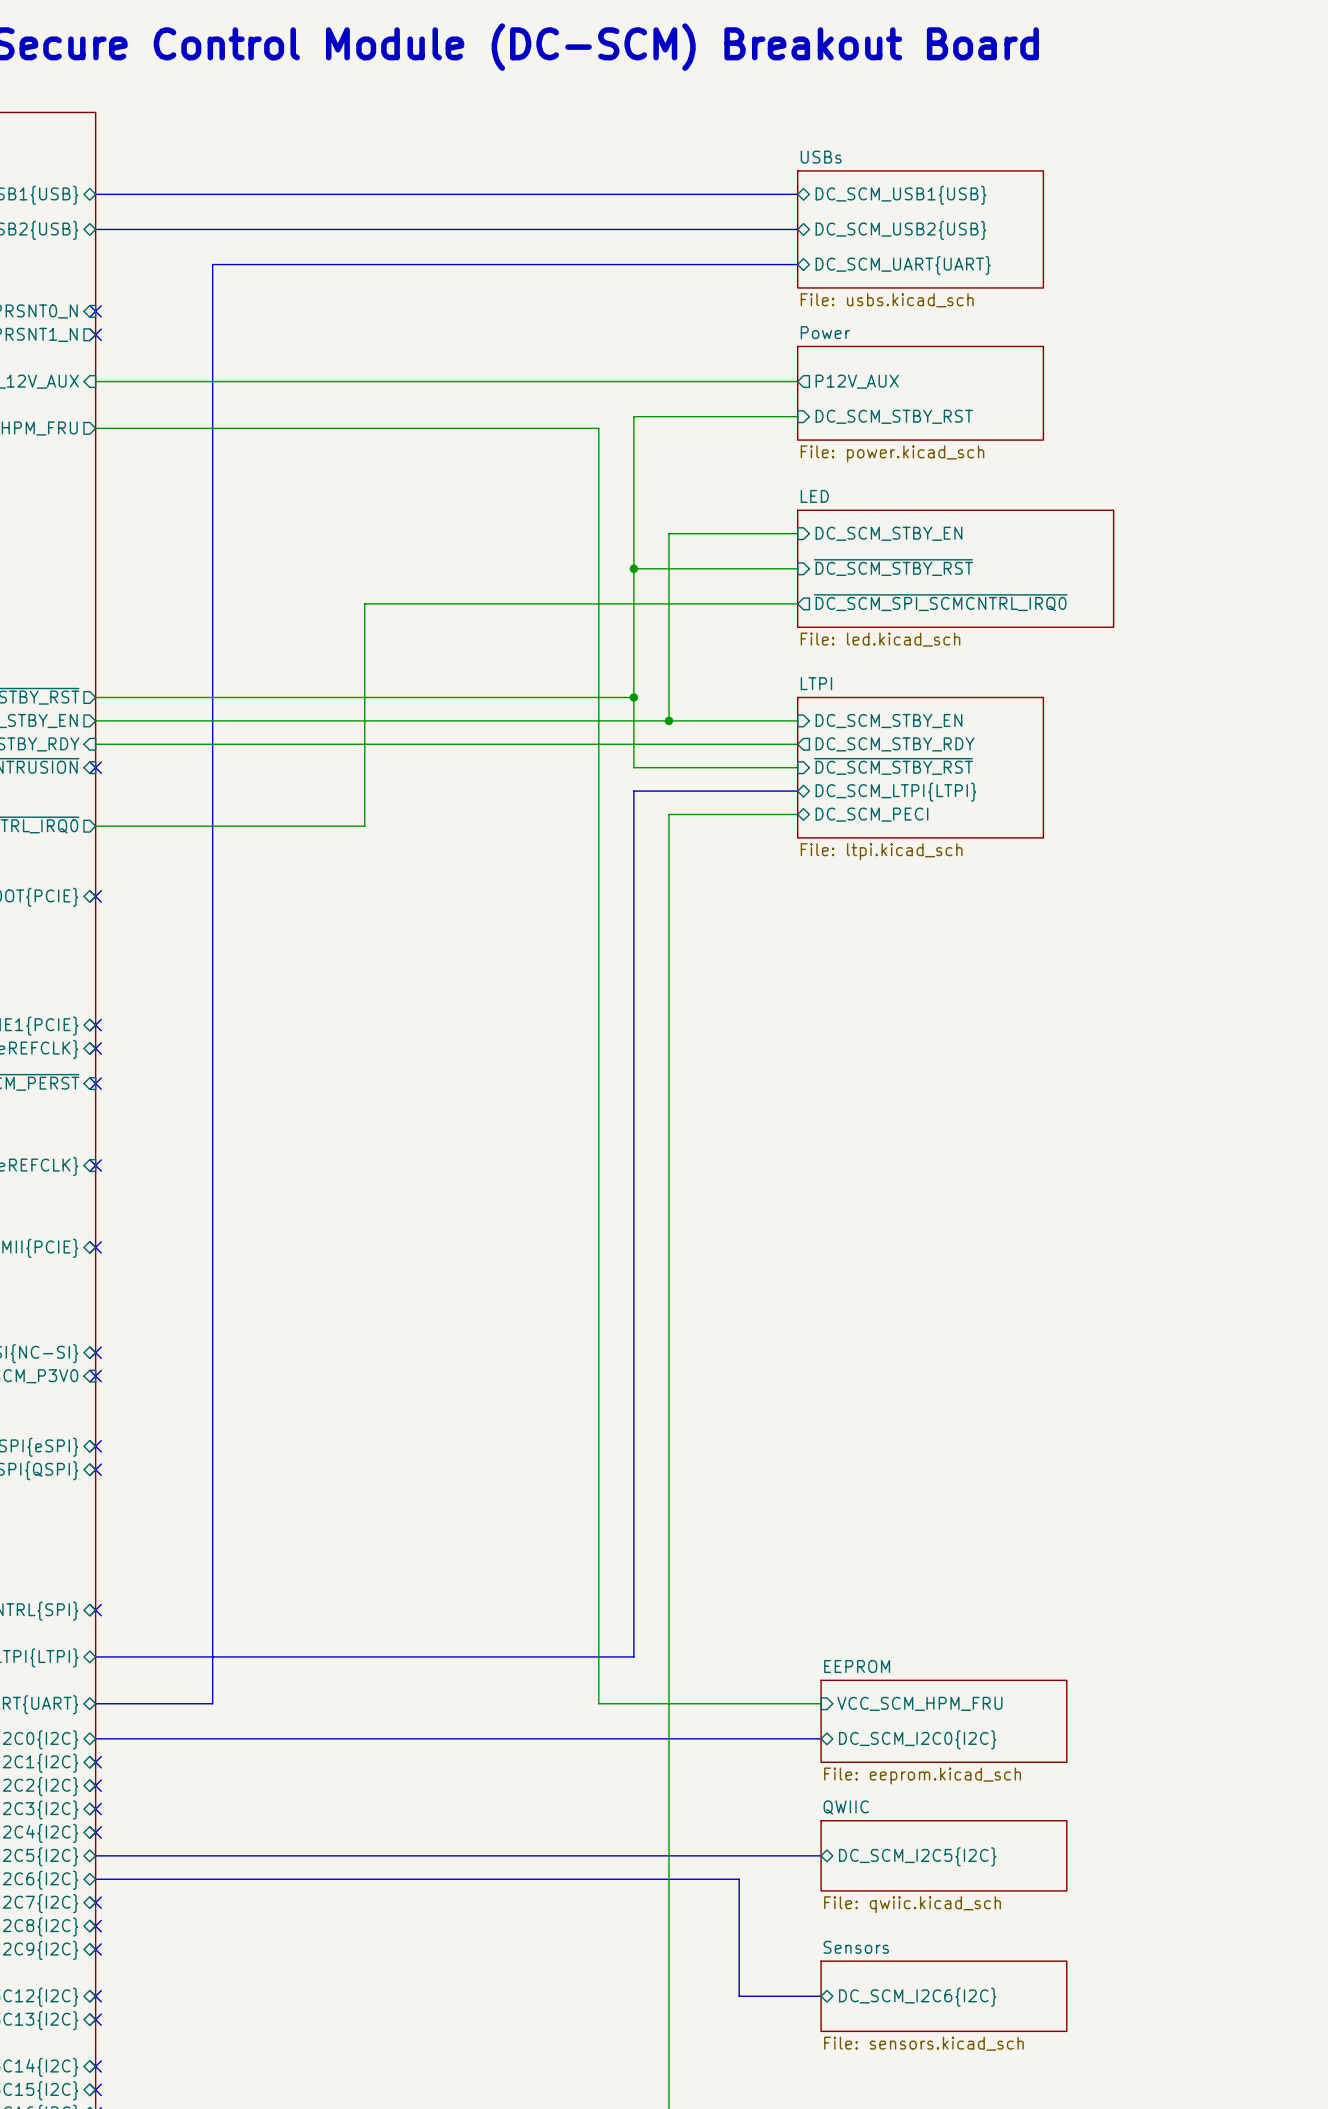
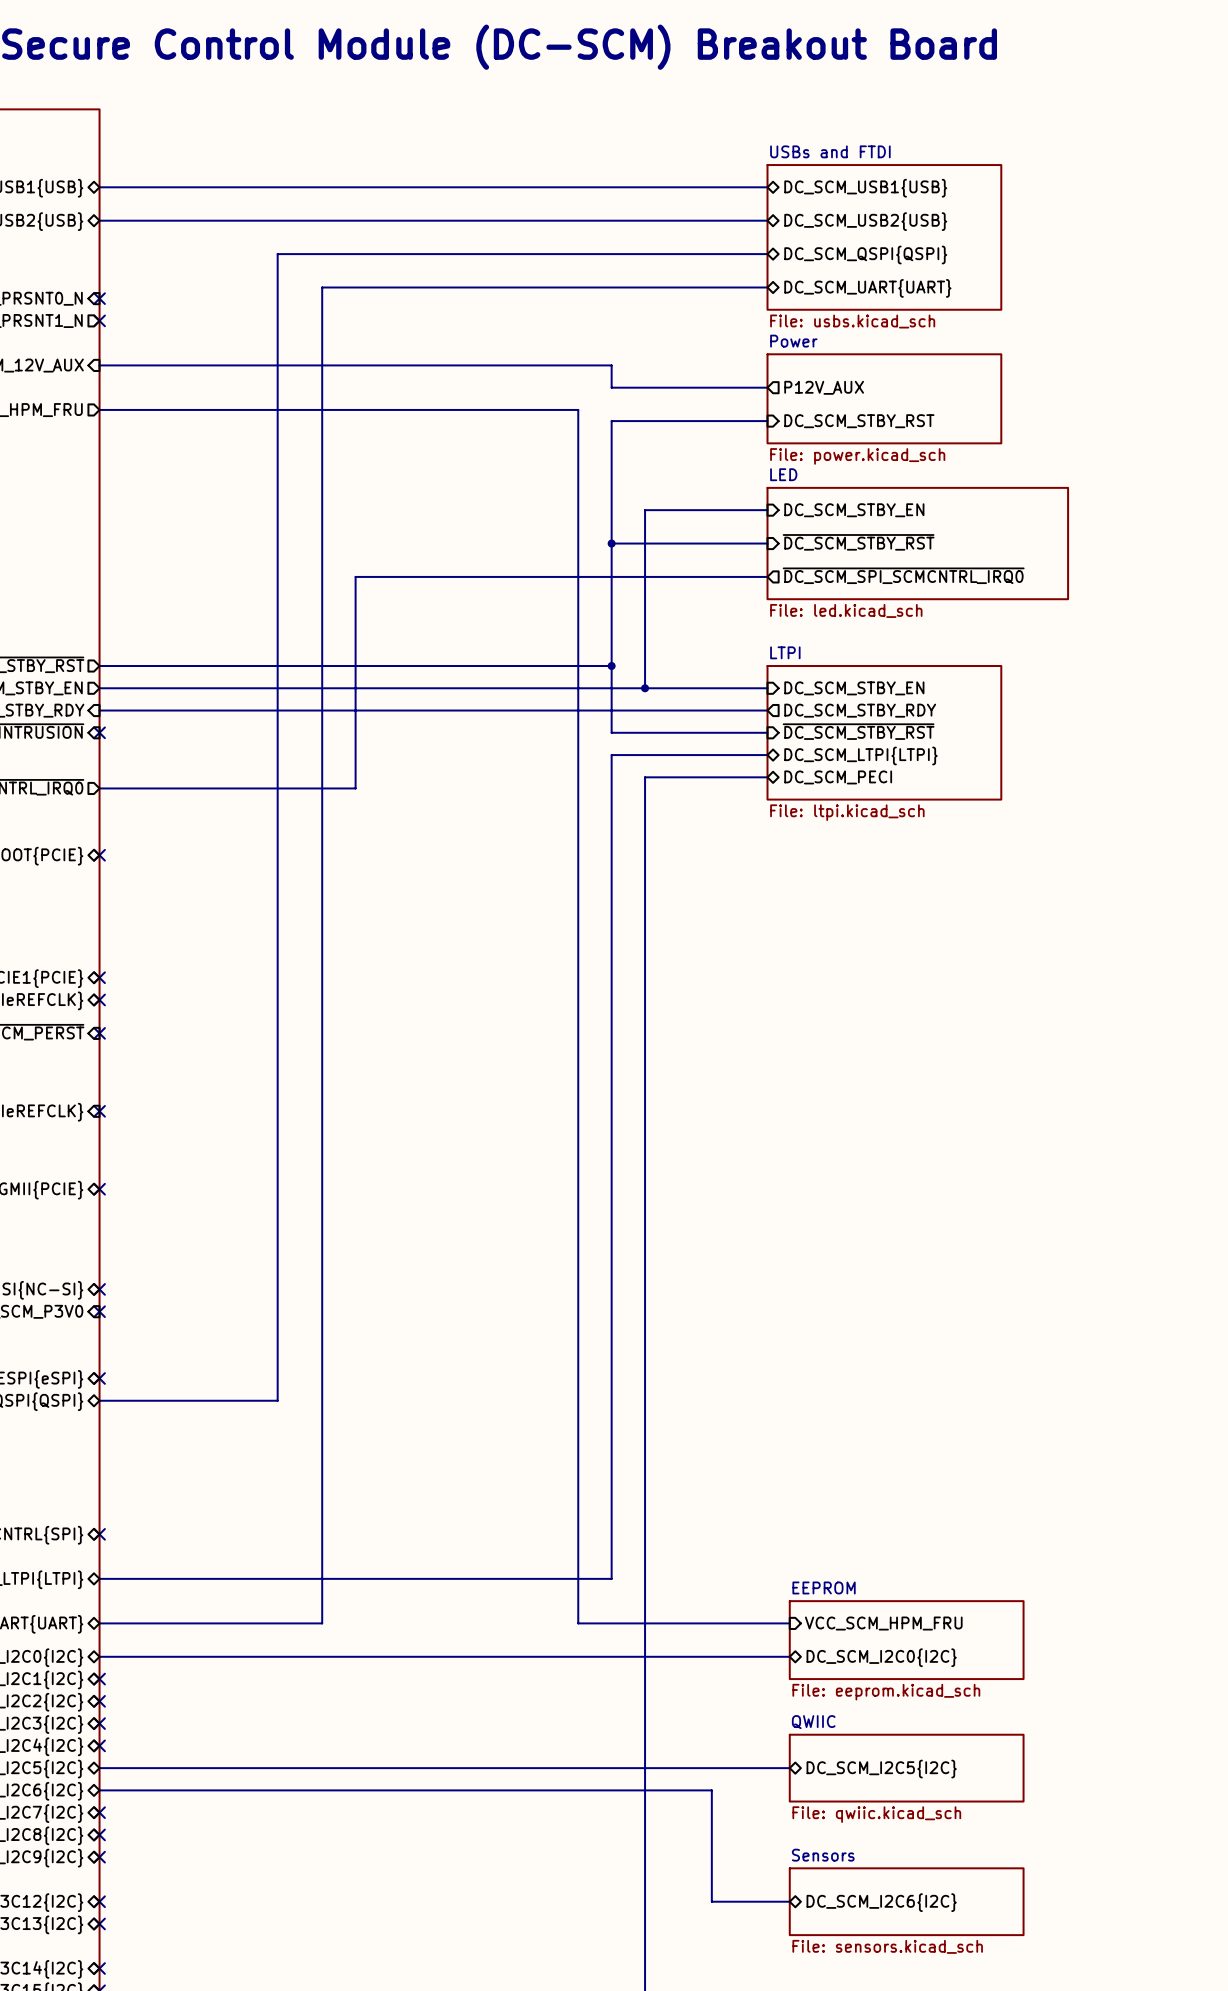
sheet USBs: File: usbs.kicad_sch (920, 229) -> none
sheet USBs and FTDI: none -> File: usbs.kicad_sch (884, 237)
bus: (282, 264) (212, 264) (212, 1703) -> (277, 254) (277, 1400) (99, 1400)
sheet pin: DC_SCM_UART{UART} (903, 265) -> DC_SCM_QSPI{QSPI} (865, 255)
bus: none -> (767, 287) (322, 287) (322, 1623) (210, 1623)
sheet pin: none -> DC_SCM_UART{UART} (867, 288)
wire: (633, 381) (797, 381) -> (611, 365) (611, 387) (767, 387)
sheet pin position: P12V_AUX (857, 381) -> P12V_AUX (824, 387)
sheet Power position: (920, 393) -> (884, 398)
wire: (797, 416) (633, 416) (633, 440) -> (767, 421) (611, 421)
sheet pin position: DC_SCM_STBY_RST (894, 416) -> DC_SCM_STBY_RST (859, 421)
no-connect mark: (95, 1469) -> none

